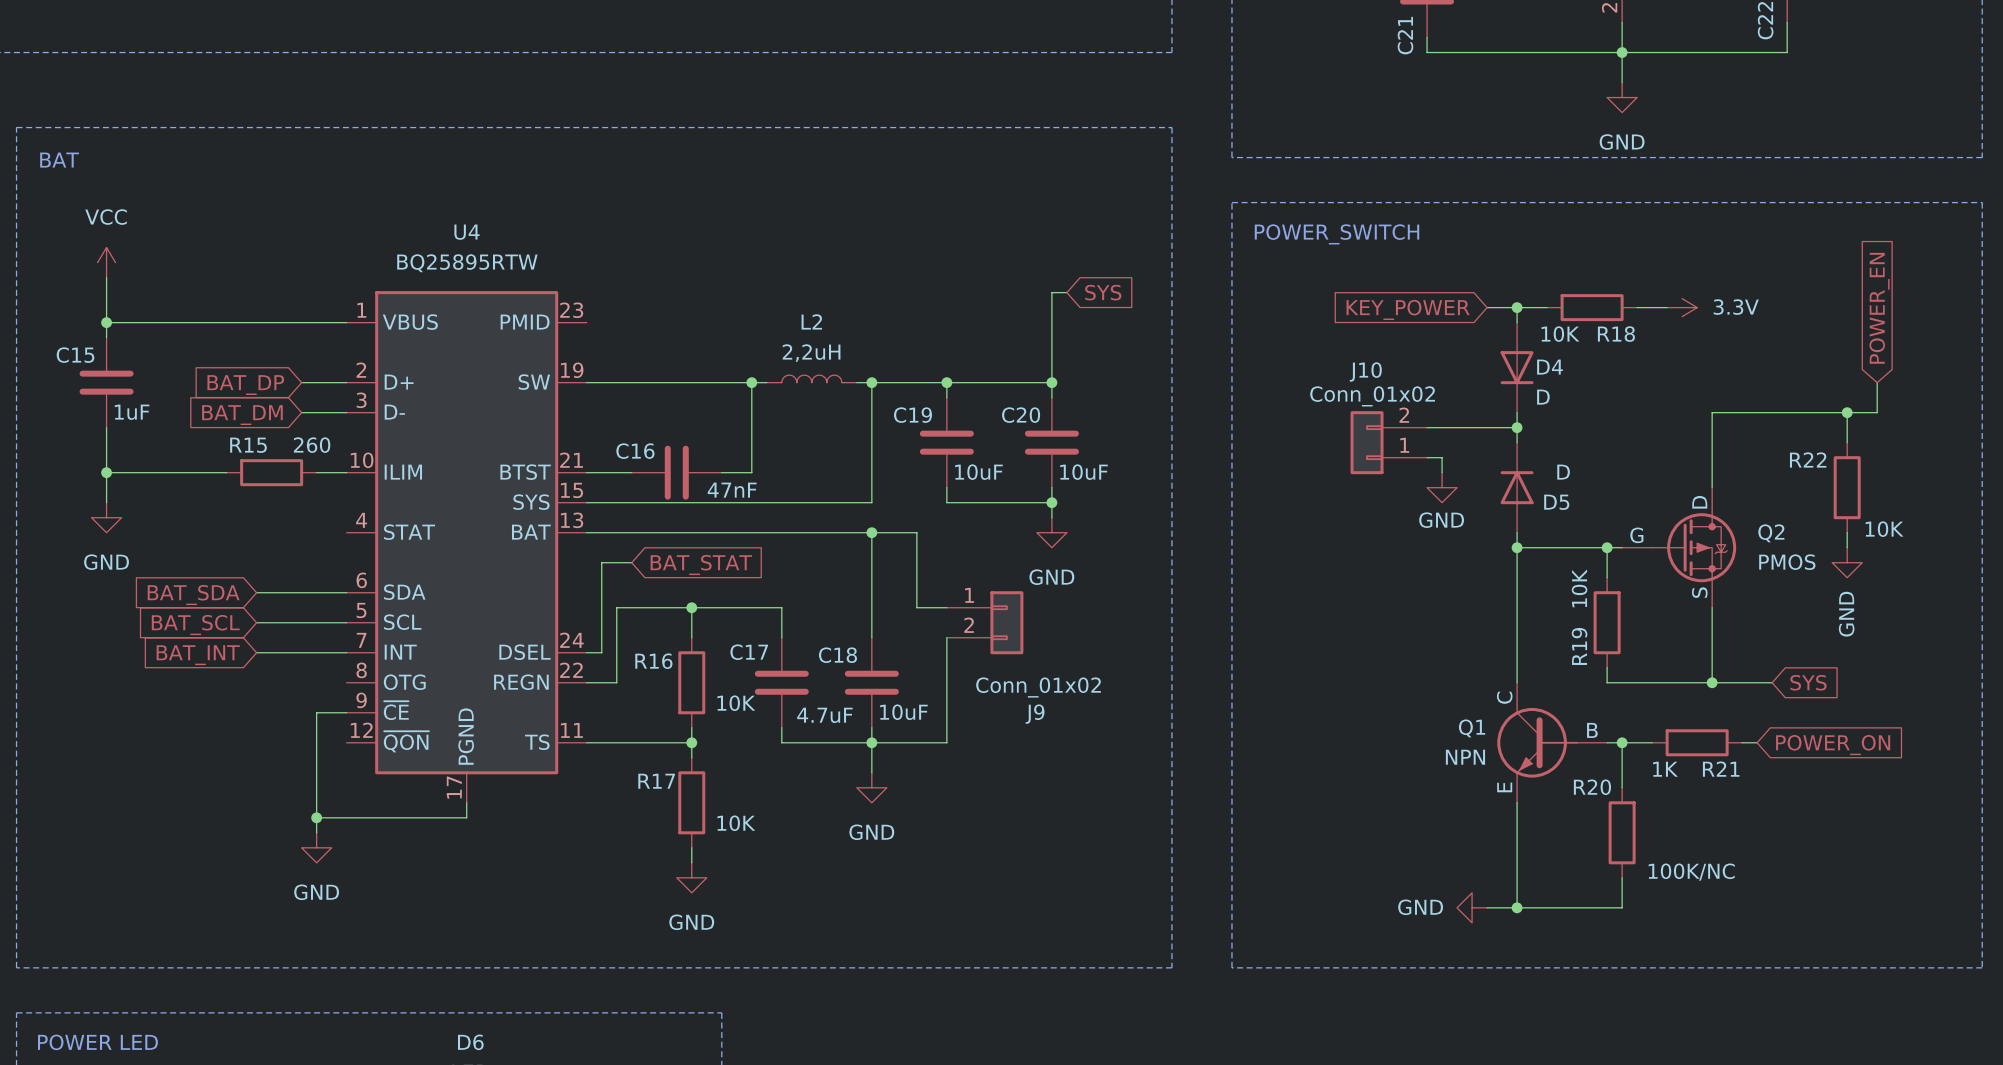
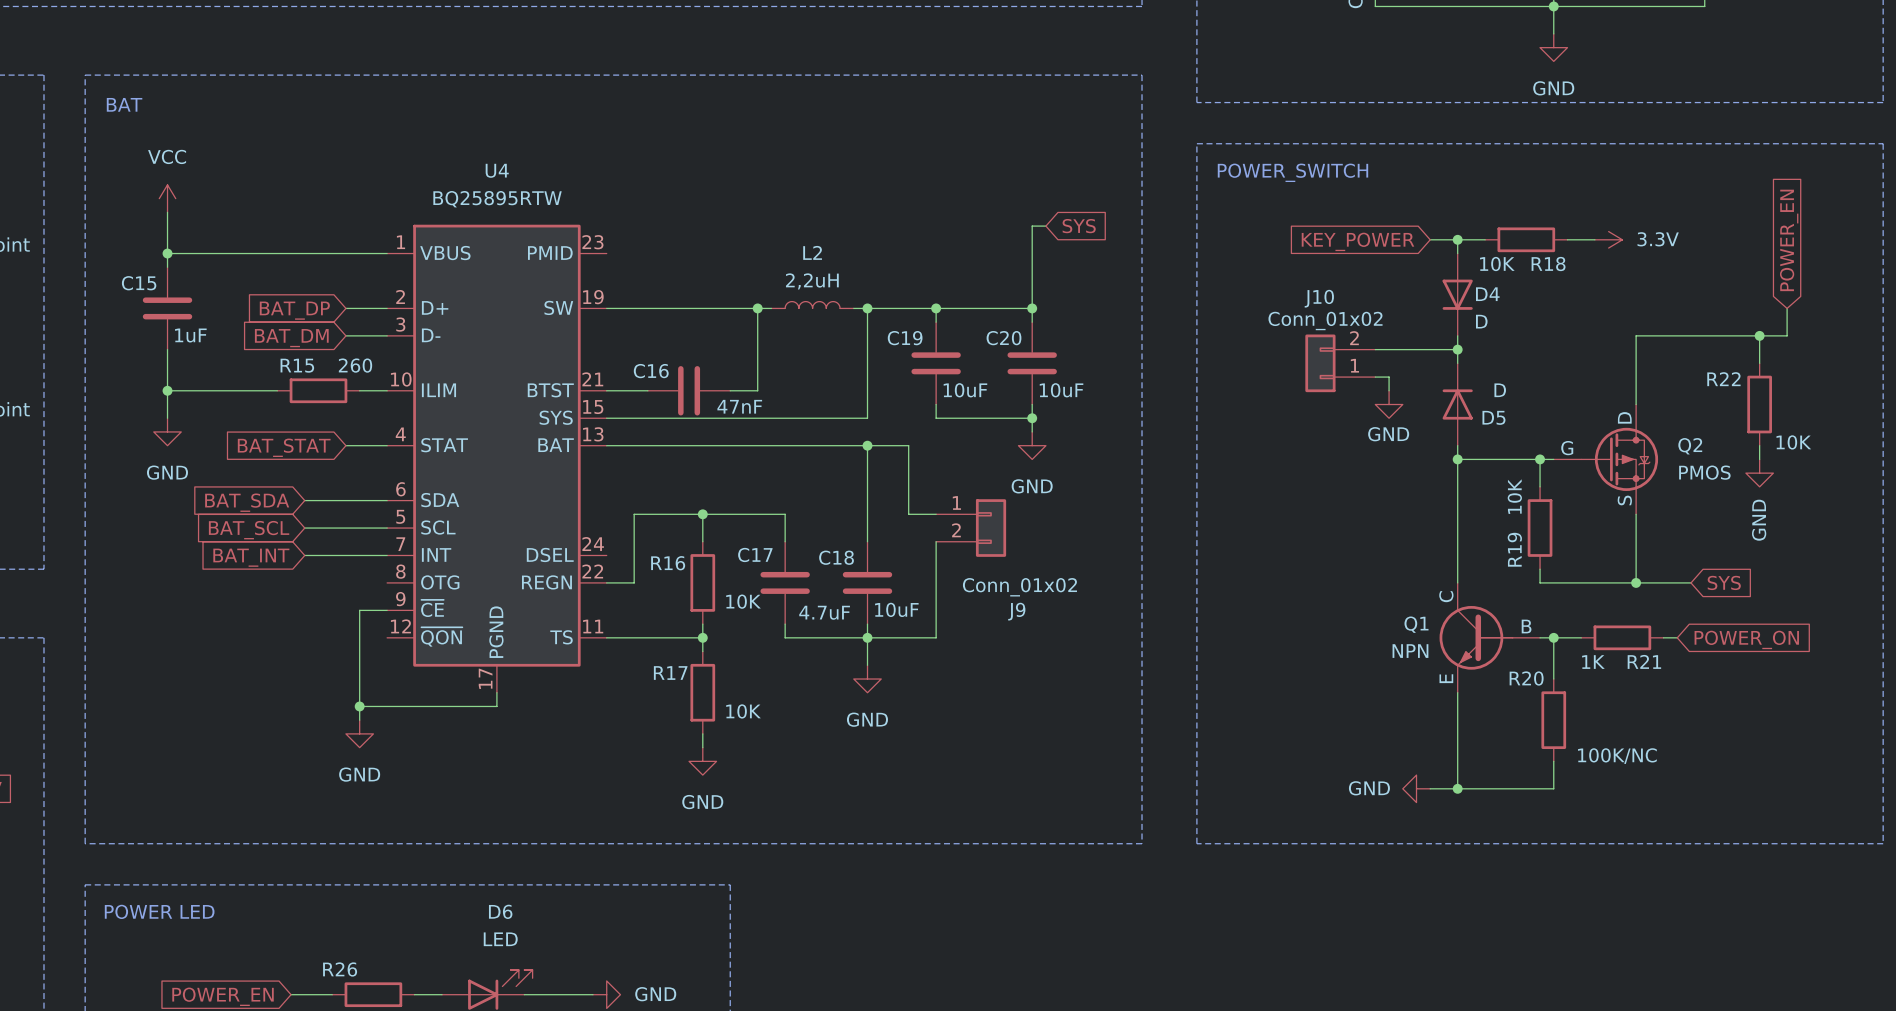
wire: none -> (345, 445) (387, 445)
global label: none -> BAT_STAT (284, 447)
wire: (631, 562) (601, 562) (601, 652) (586, 652) -> none
global label: BAT_STAT (701, 565) -> none

